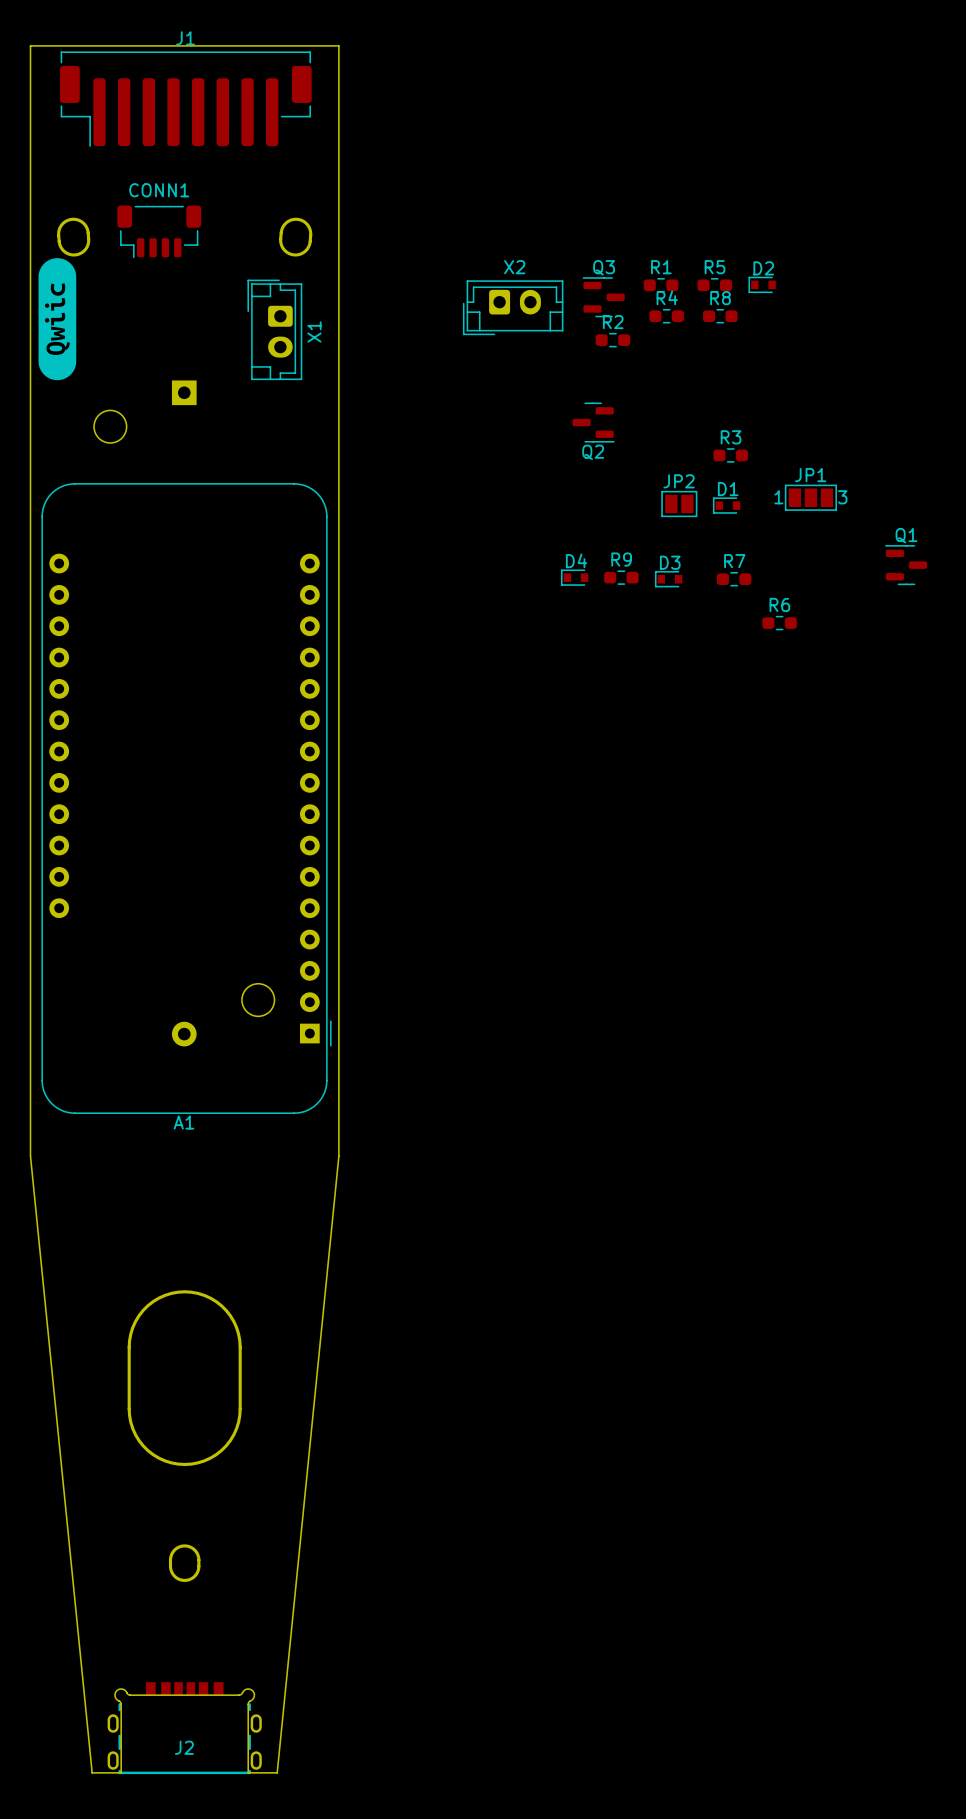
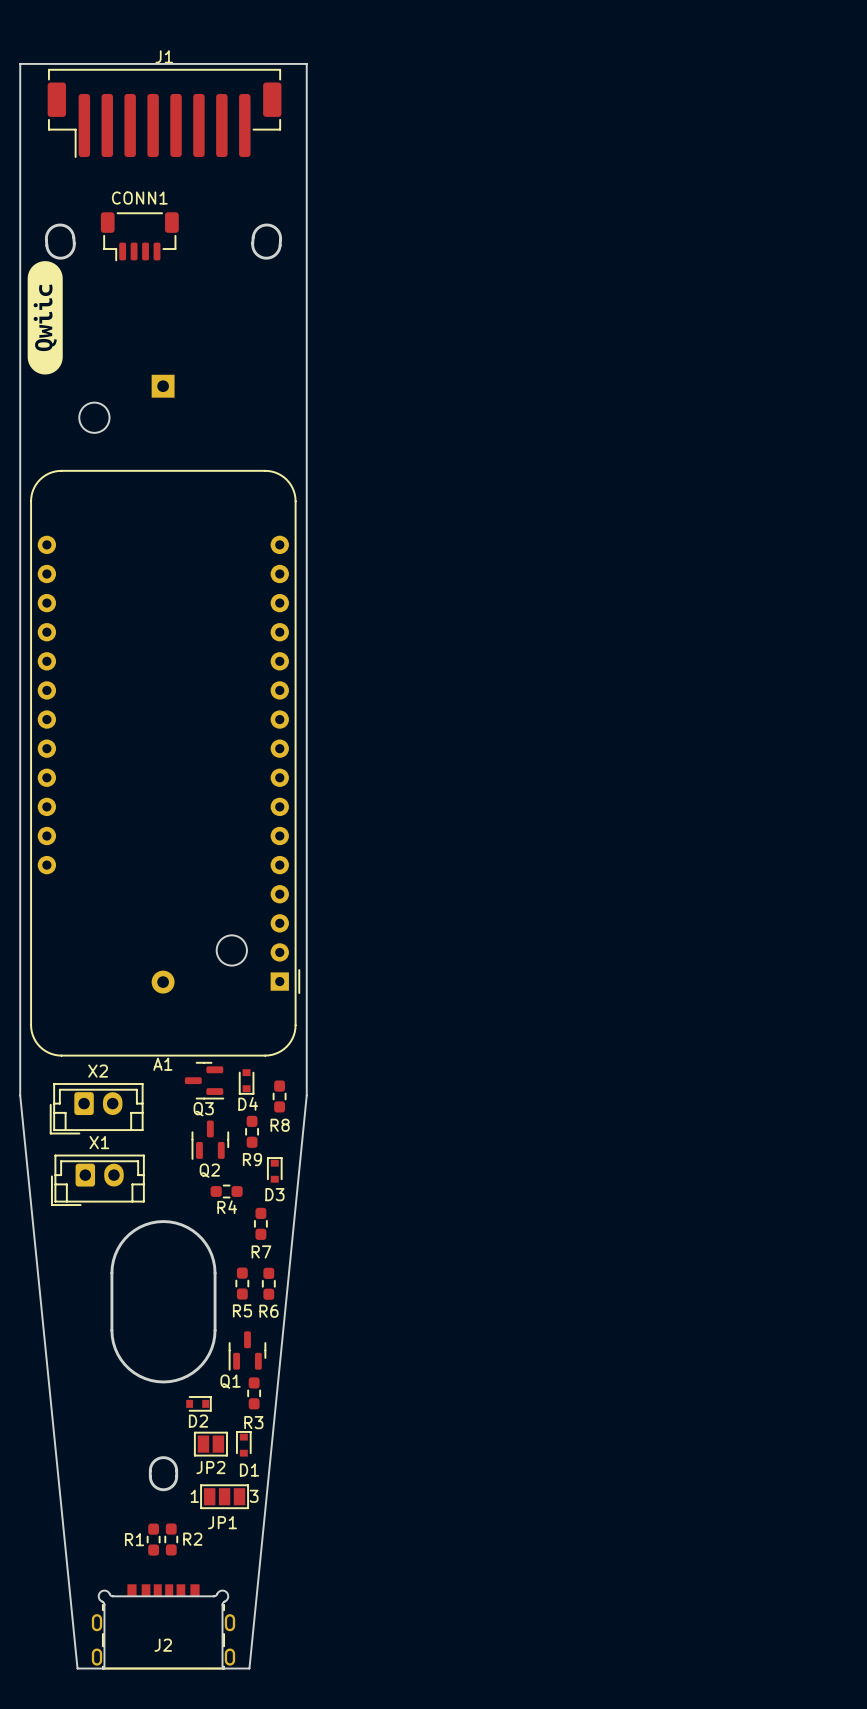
R1 name position: R1 (661, 267) -> R1 (134, 1539)
R5 name position: R5 (715, 267) -> R5 (242, 1310)
D2 rotation: 0° (762, 284) -> 180° (198, 1403)
D2 position: (762, 284) -> (198, 1403)
R1 rotation: 0° (661, 285) -> 90° clockwise (153, 1539)
R1 position: (661, 285) -> (153, 1539)
R5 rotation: 0° (714, 285) -> 90° clockwise (242, 1283)
R5 position: (714, 285) -> (242, 1283)
Q3 rotation: 0° (603, 297) -> 180° (204, 1080)
Q3 position: (603, 297) -> (204, 1080)
R4 name position: R4 (667, 297) -> R4 (227, 1207)
R8 name position: R8 (720, 298) -> R8 (280, 1125)
X2 position: (513, 307) -> (96, 1108)
R4 position: (666, 316) -> (226, 1191)
R8 rotation: 0° (720, 316) -> 90° clockwise (279, 1096)
R8 position: (720, 316) -> (279, 1096)
X1 rotation: 0° (274, 329) -> 90° counterclockwise (97, 1180)
X1 position: (274, 329) -> (97, 1180)
R2 rotation: 0° (612, 340) -> 90° clockwise (171, 1539)
R2 position: (612, 340) -> (171, 1539)
Q2 rotation: 0° (593, 422) -> 90° clockwise (210, 1140)
Q2 position: (593, 422) -> (210, 1140)
R3 name position: R3 (731, 437) -> R3 (253, 1422)
R3 rotation: 0° (730, 455) -> 90° clockwise (254, 1393)
R3 position: (730, 455) -> (254, 1393)
JP1 name position: JP1 (810, 475) -> JP1 (222, 1522)
JP2 name position: JP2 (679, 481) -> JP2 (210, 1467)
D1 name position: D1 (728, 489) -> D1 (249, 1470)
JP1 position: (810, 497) -> (224, 1496)
JP2 position: (679, 504) -> (210, 1444)
D1 rotation: 0° (726, 505) -> 90° clockwise (243, 1443)
D1 position: (726, 505) -> (243, 1443)
Q1 name position: Q1 (906, 535) -> Q1 (230, 1381)
R9 name position: R9 (621, 559) -> R9 (252, 1159)
D4 name position: D4 (576, 560) -> D4 (248, 1103)
R7 name position: R7 (734, 561) -> R7 (261, 1251)
D3 name position: D3 (670, 562) -> D3 (274, 1194)
Q1 rotation: 0° (906, 565) -> 90° counterclockwise (247, 1350)
Q1 position: (906, 565) -> (247, 1350)
D4 rotation: 0° (574, 577) -> 90° counterclockwise (246, 1081)
D4 position: (574, 577) -> (246, 1081)
R9 rotation: 0° (621, 577) -> 90° clockwise (252, 1131)
R9 position: (621, 577) -> (252, 1131)
D3 rotation: 0° (668, 579) -> 90° clockwise (274, 1170)
D3 position: (668, 579) -> (274, 1170)
R7 rotation: 0° (734, 579) -> 90° clockwise (260, 1223)
R7 position: (734, 579) -> (260, 1223)
R6 name position: R6 (779, 604) -> R6 (268, 1311)
R6 rotation: 0° (779, 623) -> 90° clockwise (268, 1283)
R6 position: (779, 623) -> (268, 1283)

